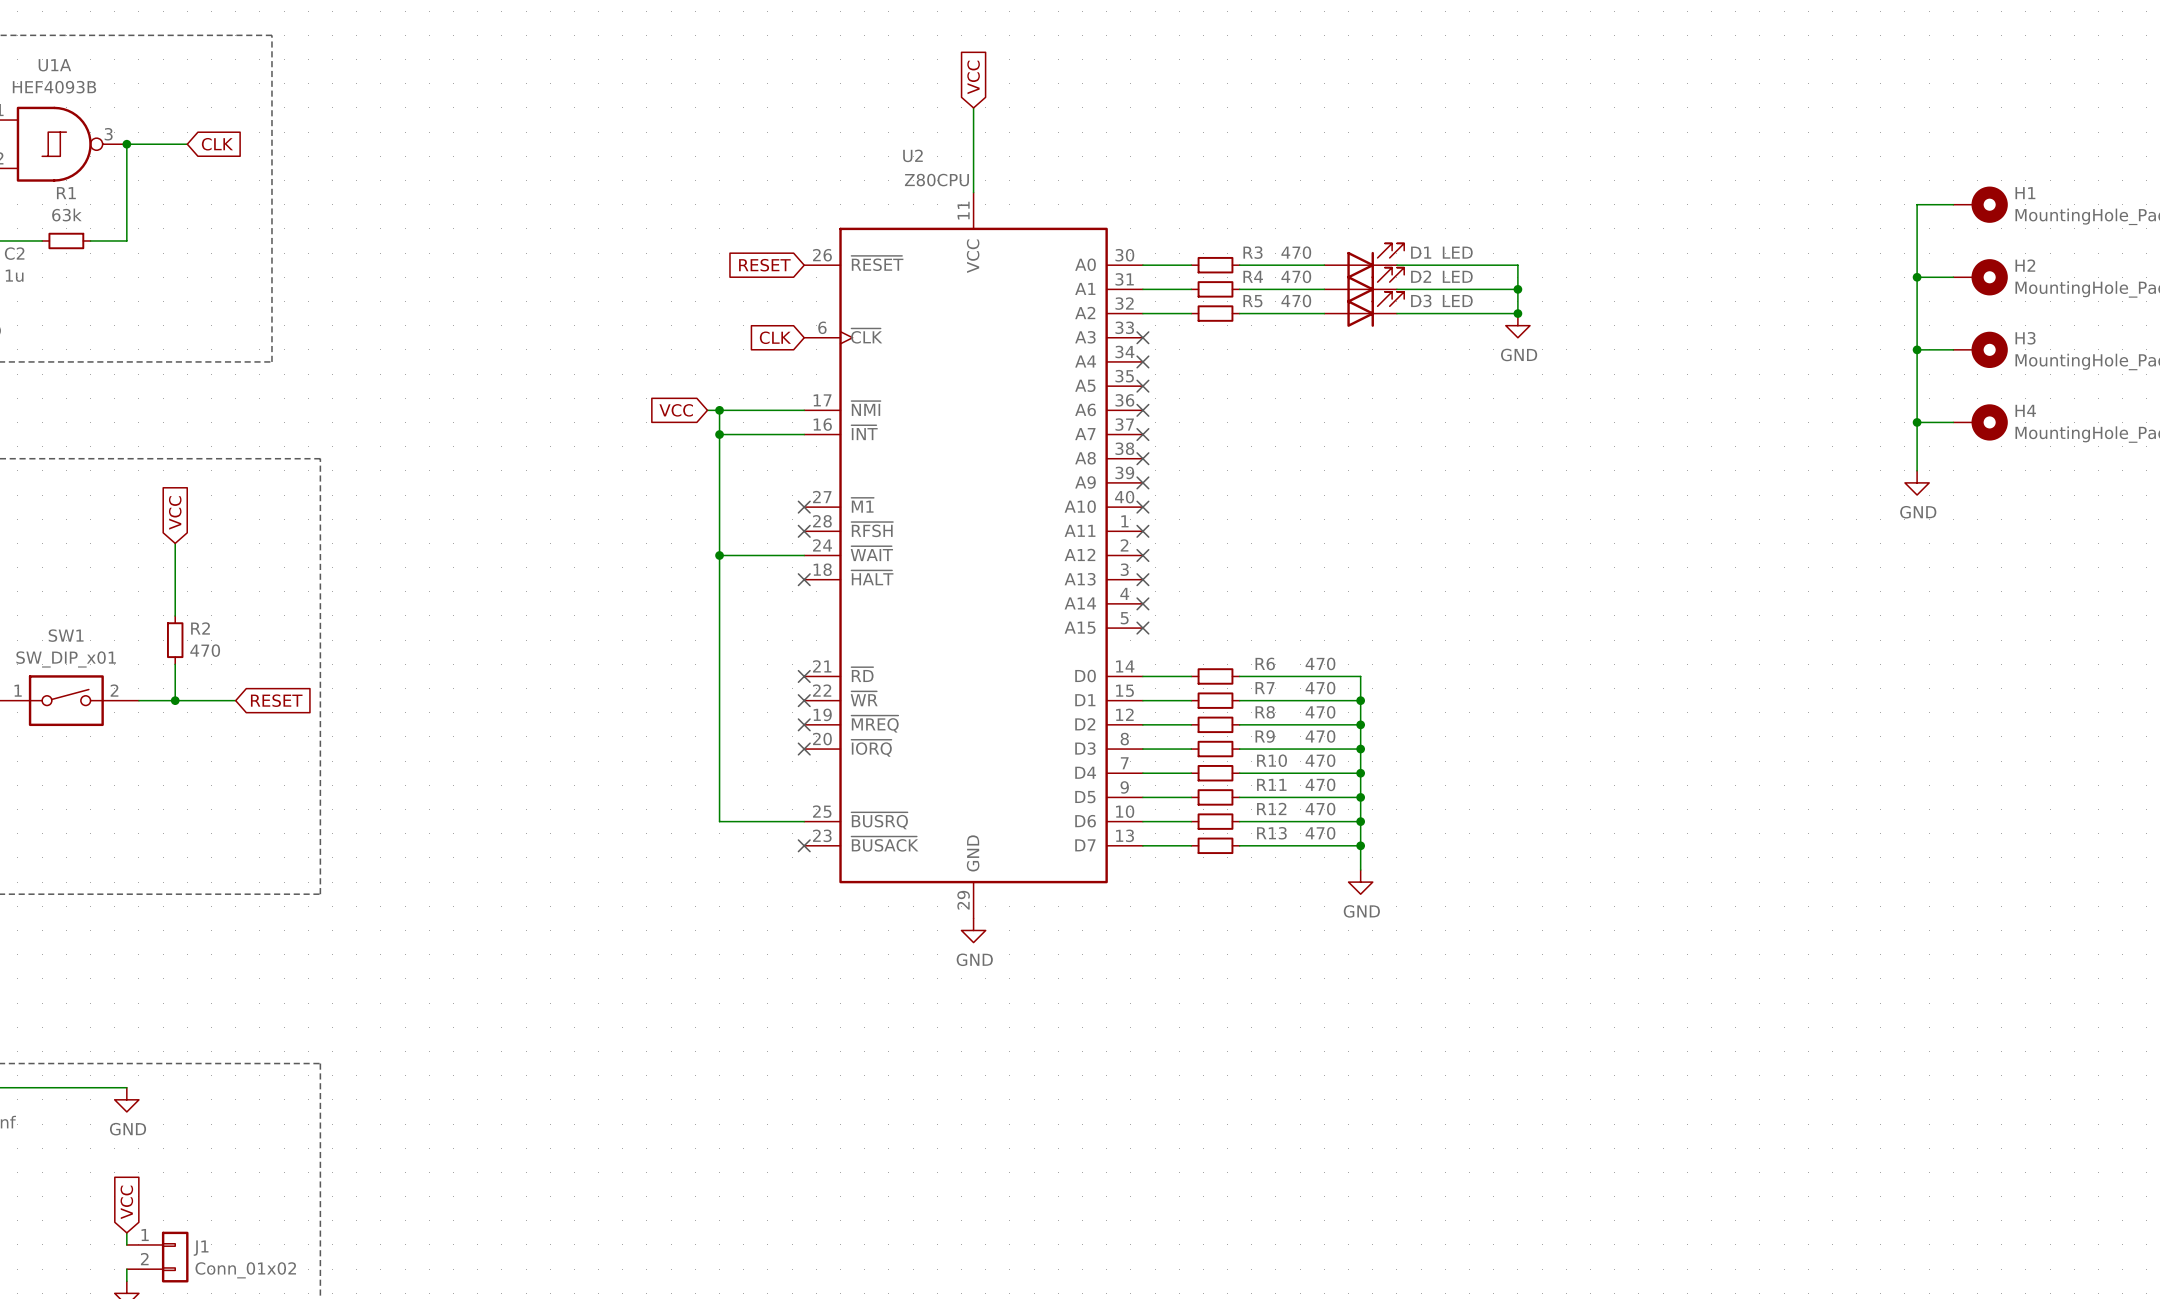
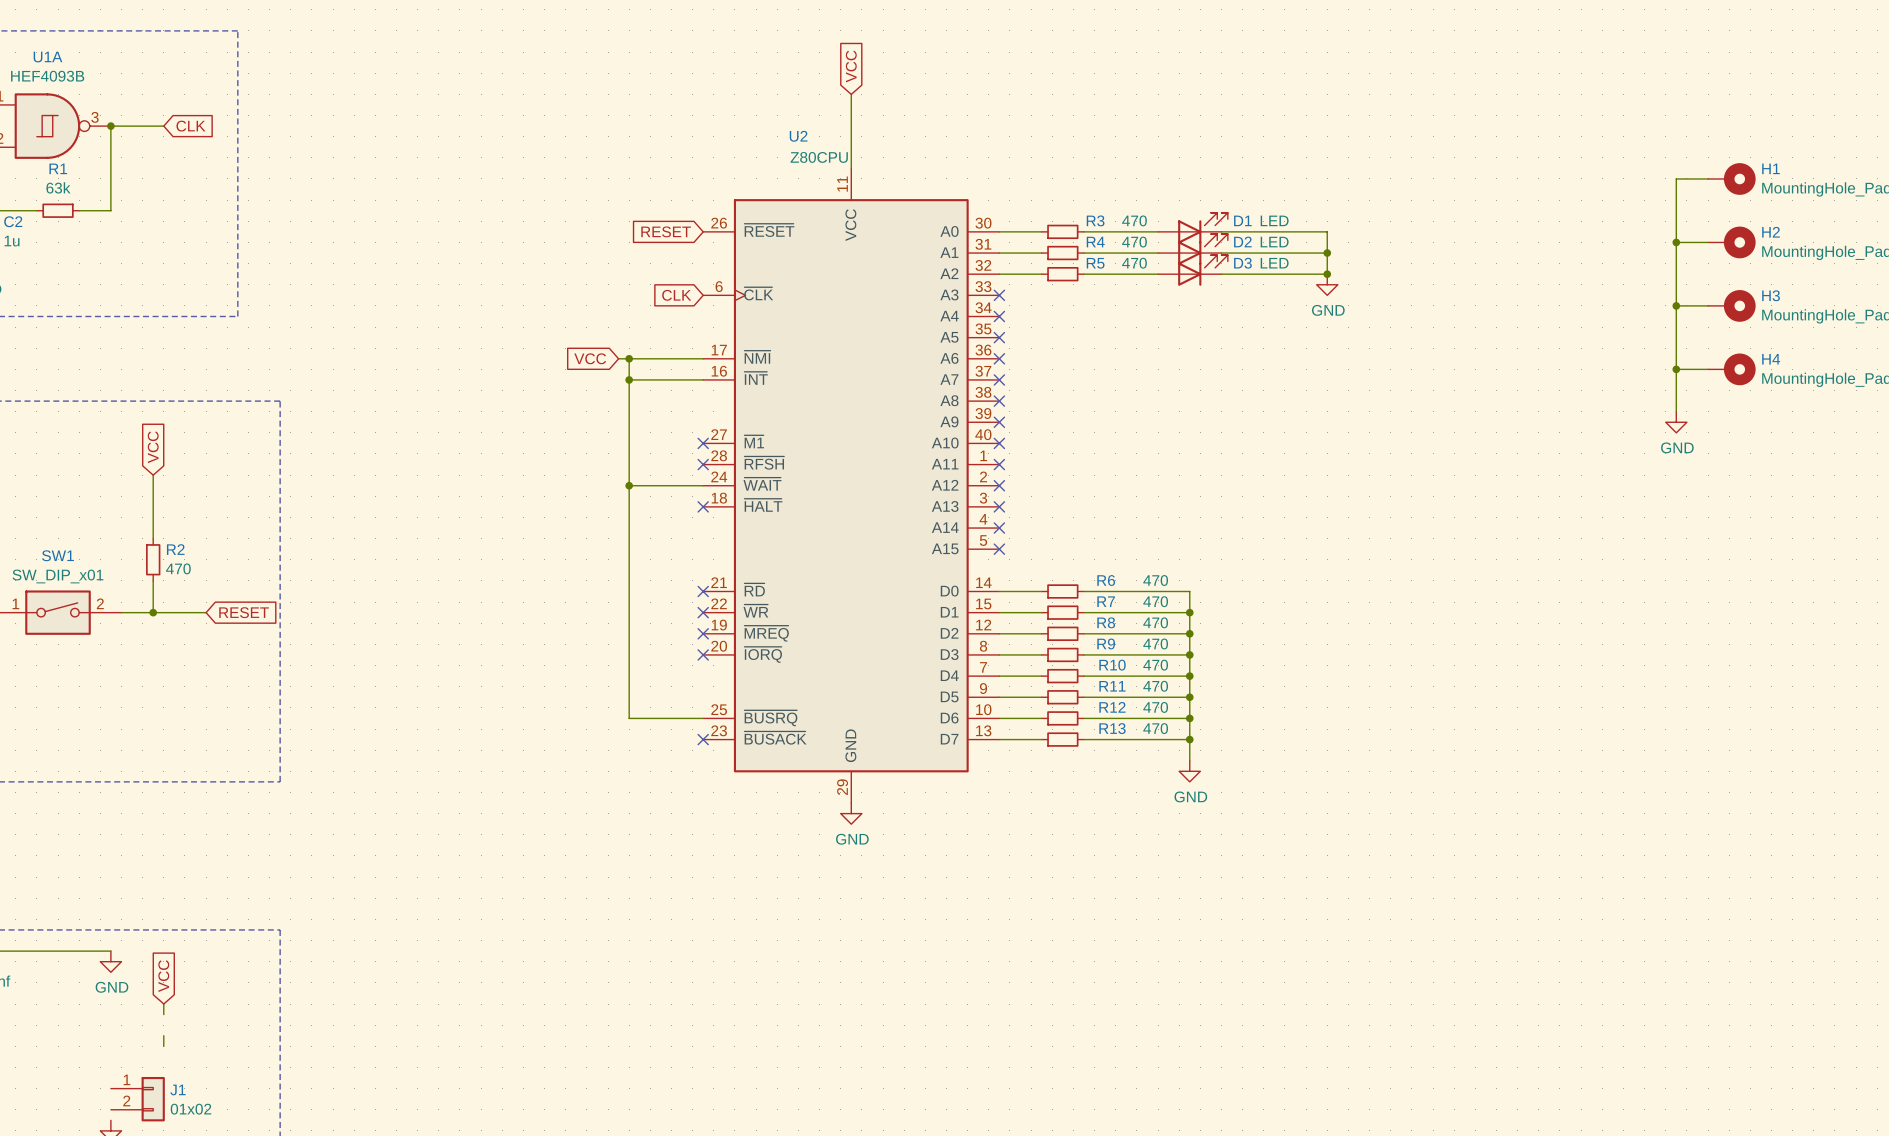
global label position: VCC (126, 1202) -> VCC (163, 976)
wire: (126, 1232) (126, 1244) -> (163, 1004) (163, 1014)
wire: (126, 1269) (126, 1281) -> (163, 1035) (163, 1046)
J1 value: Conn_01x02 (245, 1270) -> 01x02 (190, 1109)

